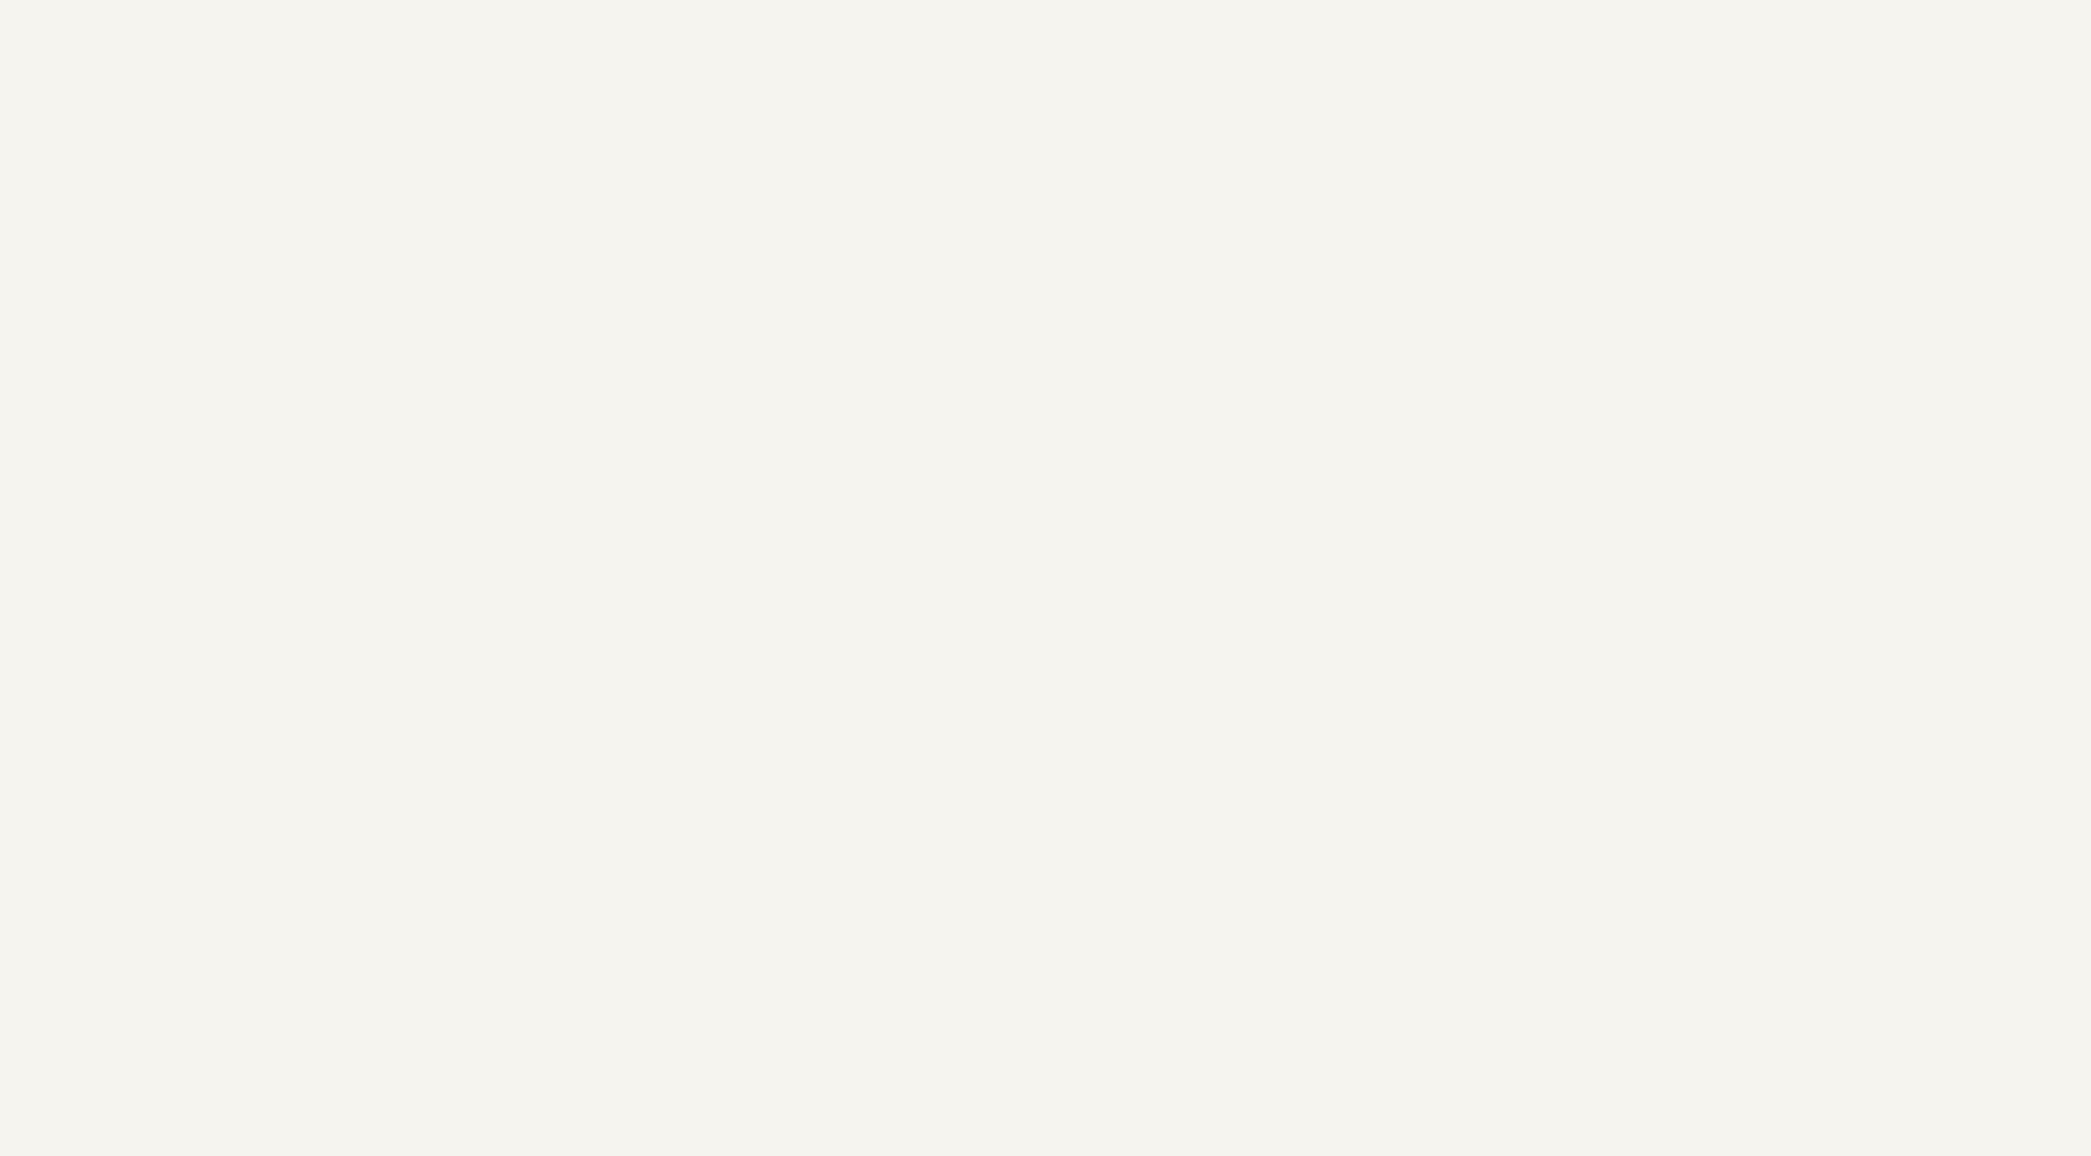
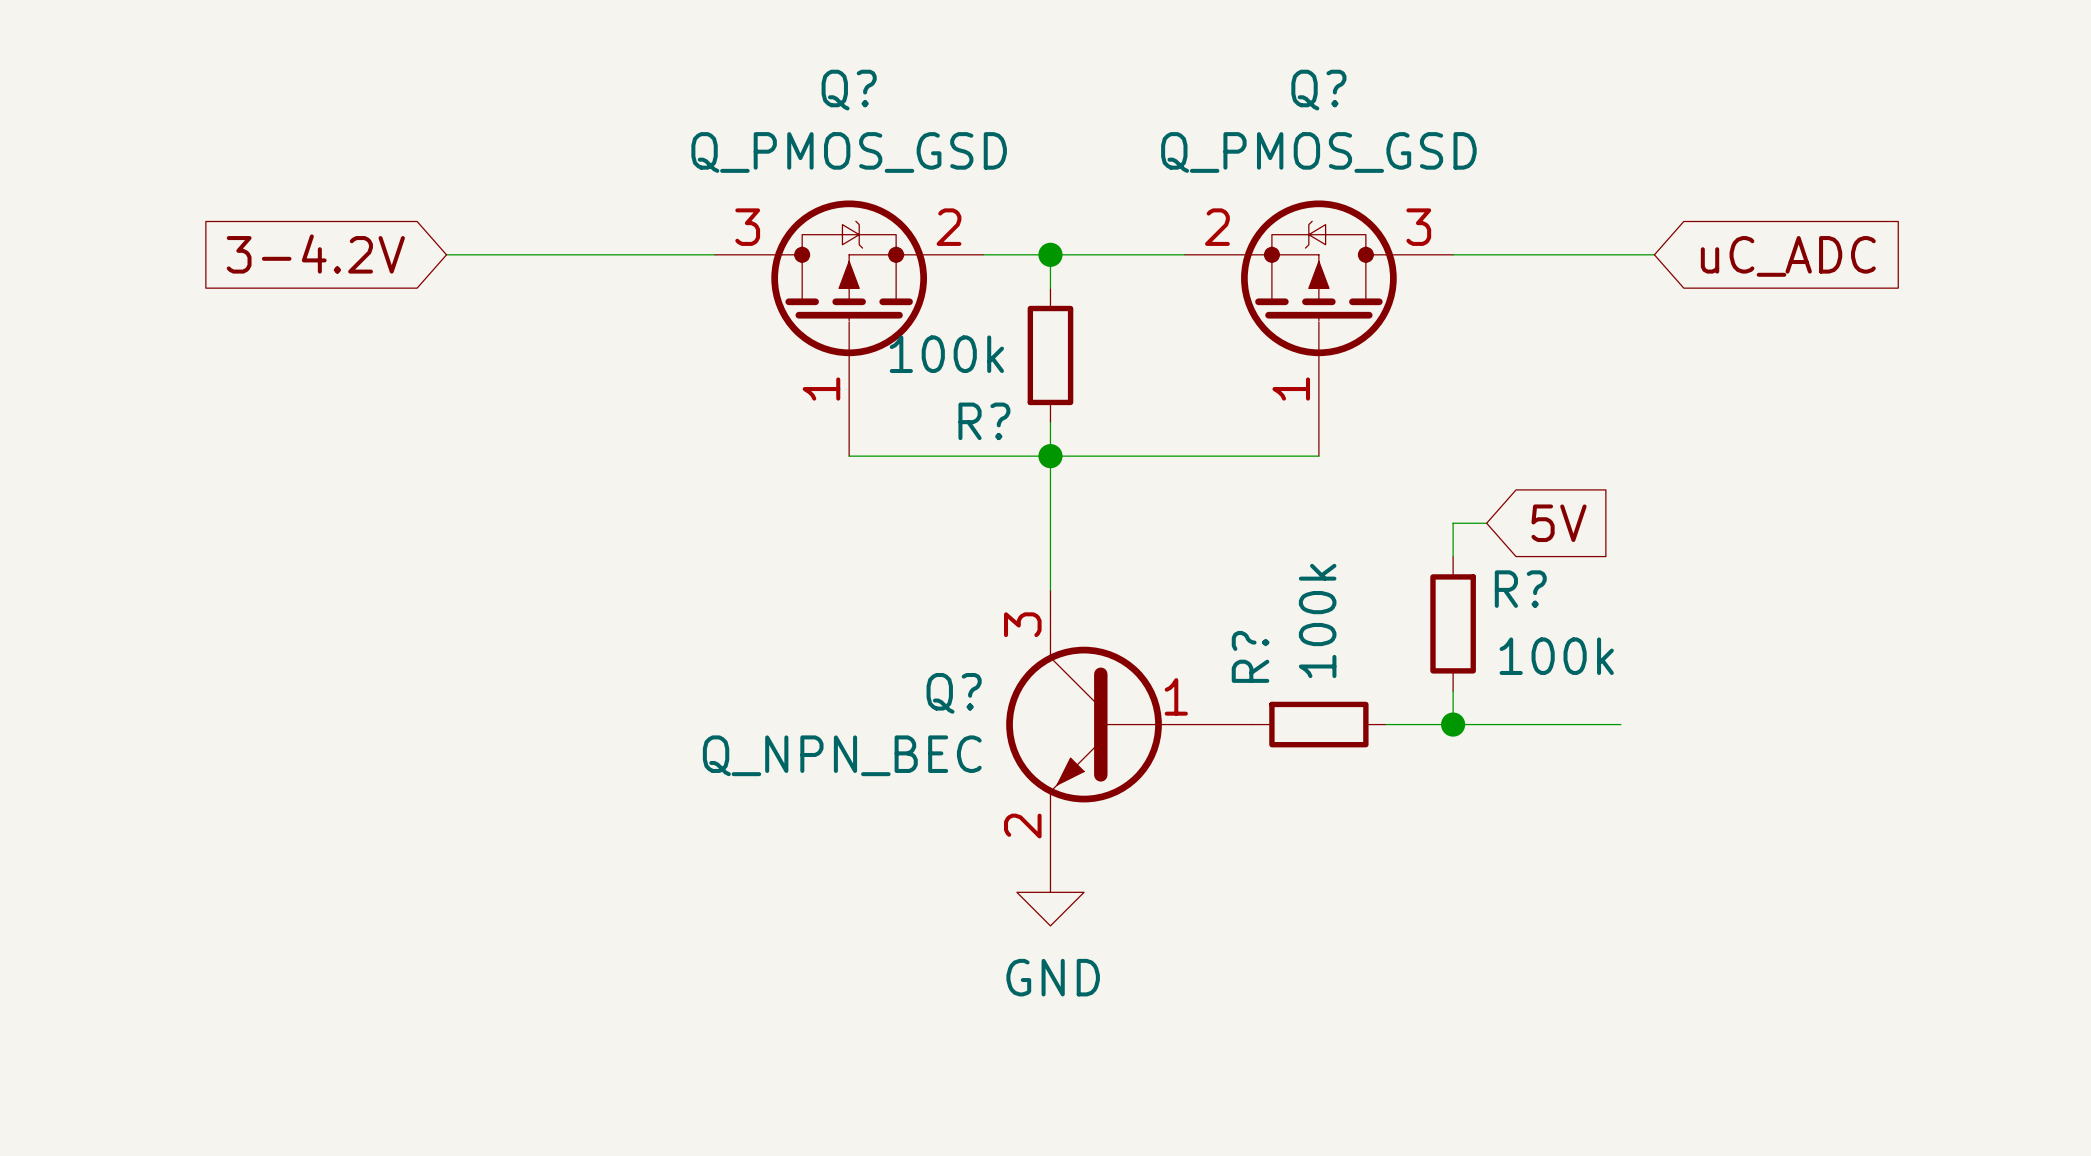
global label: none -> 3-4.2V (315, 254)
wire: none -> (446, 254) (714, 254)
wire: none -> (983, 254) (1184, 254)
wire: none -> (1050, 254) (1050, 288)
junction: none -> (1050, 254)
wire: none -> (1453, 254) (1654, 254)
global label: none -> uC_ADC (1788, 256)
Q?: none -> Q_PMOS_GSD (849, 328)
Q?: none -> Q_PMOS_GSD (1318, 328)
R?: none -> 100k (1050, 355)
wire: none -> (1050, 422) (1050, 590)
wire: none -> (849, 456) (1318, 456)
junction: none -> (1050, 456)
wire: none -> (1486, 523) (1453, 523) (1453, 556)
global label: none -> 5V (1559, 523)
R?: none -> 100k (1453, 623)
wire: none -> (1453, 691) (1453, 724)
Q?: none -> Q_NPN_BEC (1128, 724)
R?: none -> 100k (1318, 724)
wire: none -> (1386, 724) (1620, 724)
junction: none -> (1453, 724)
power symbol: none -> GND (1050, 892)

